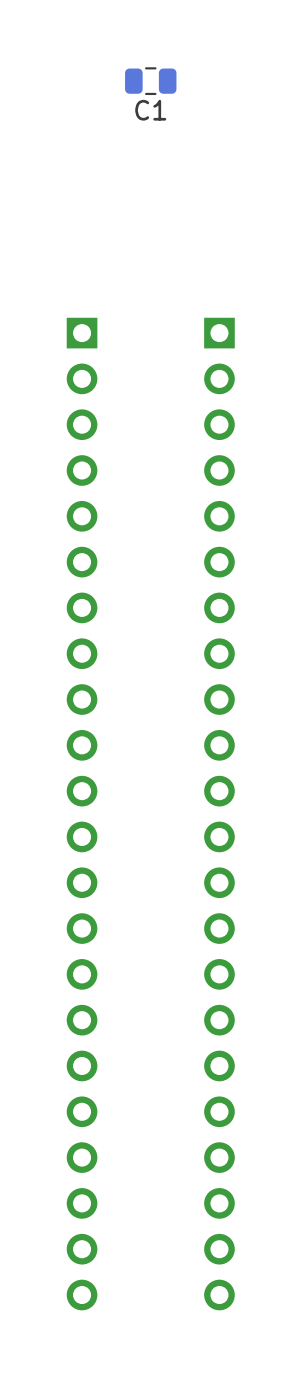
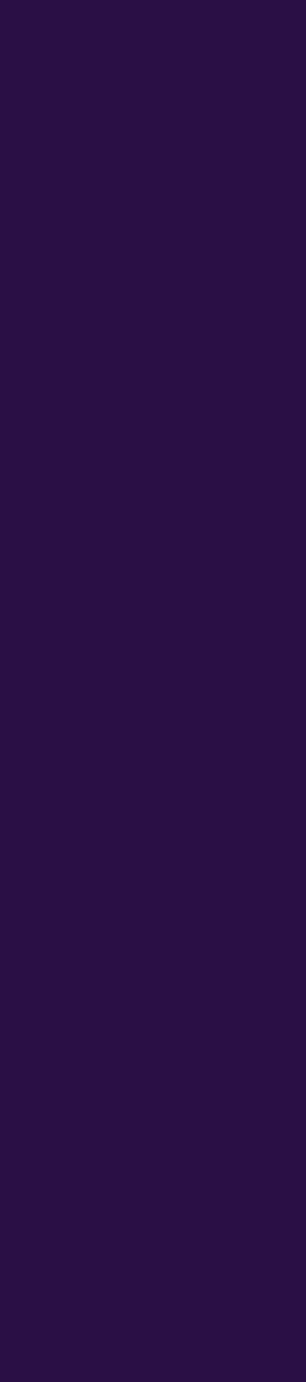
C1: (150, 81) -> none
part: (82, 814) -> none
part: (219, 814) -> none

